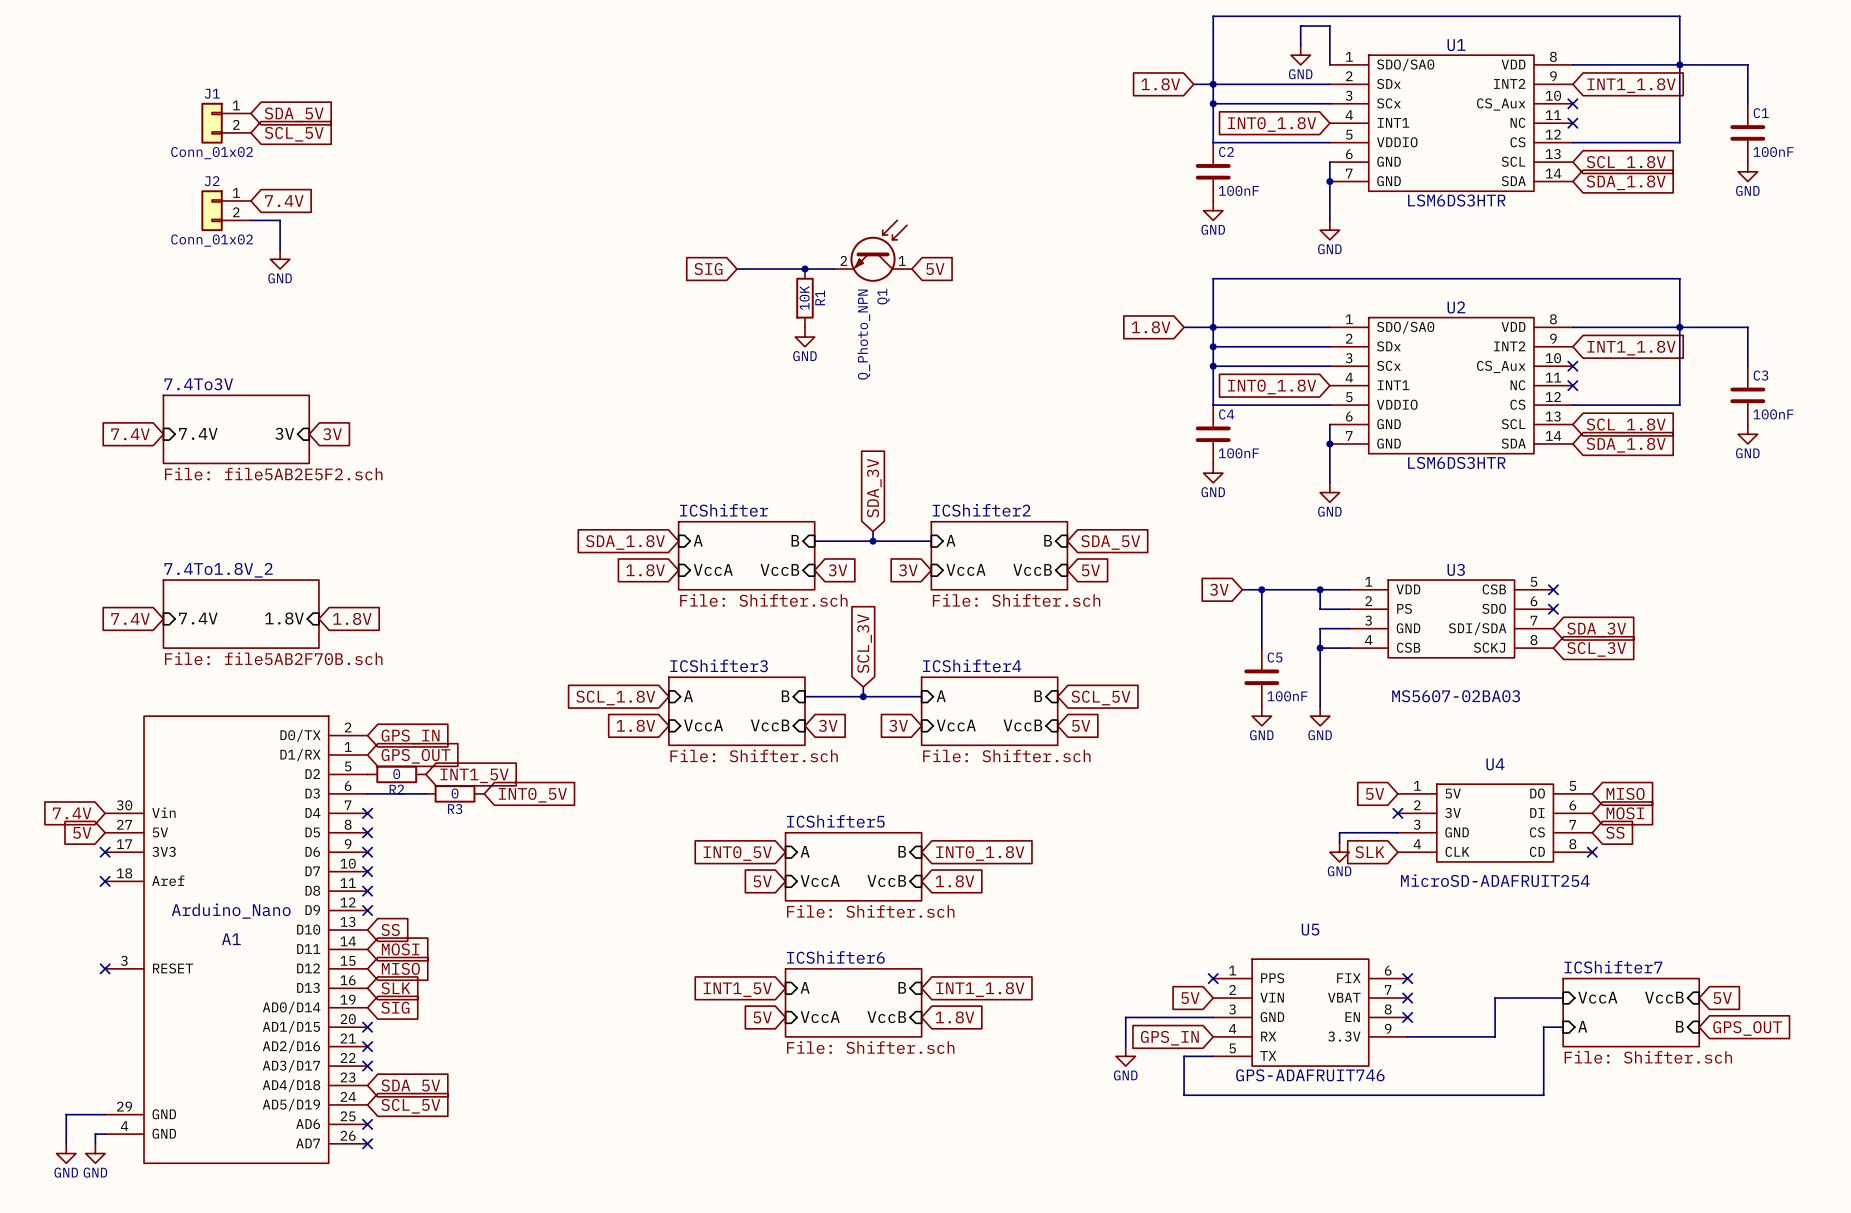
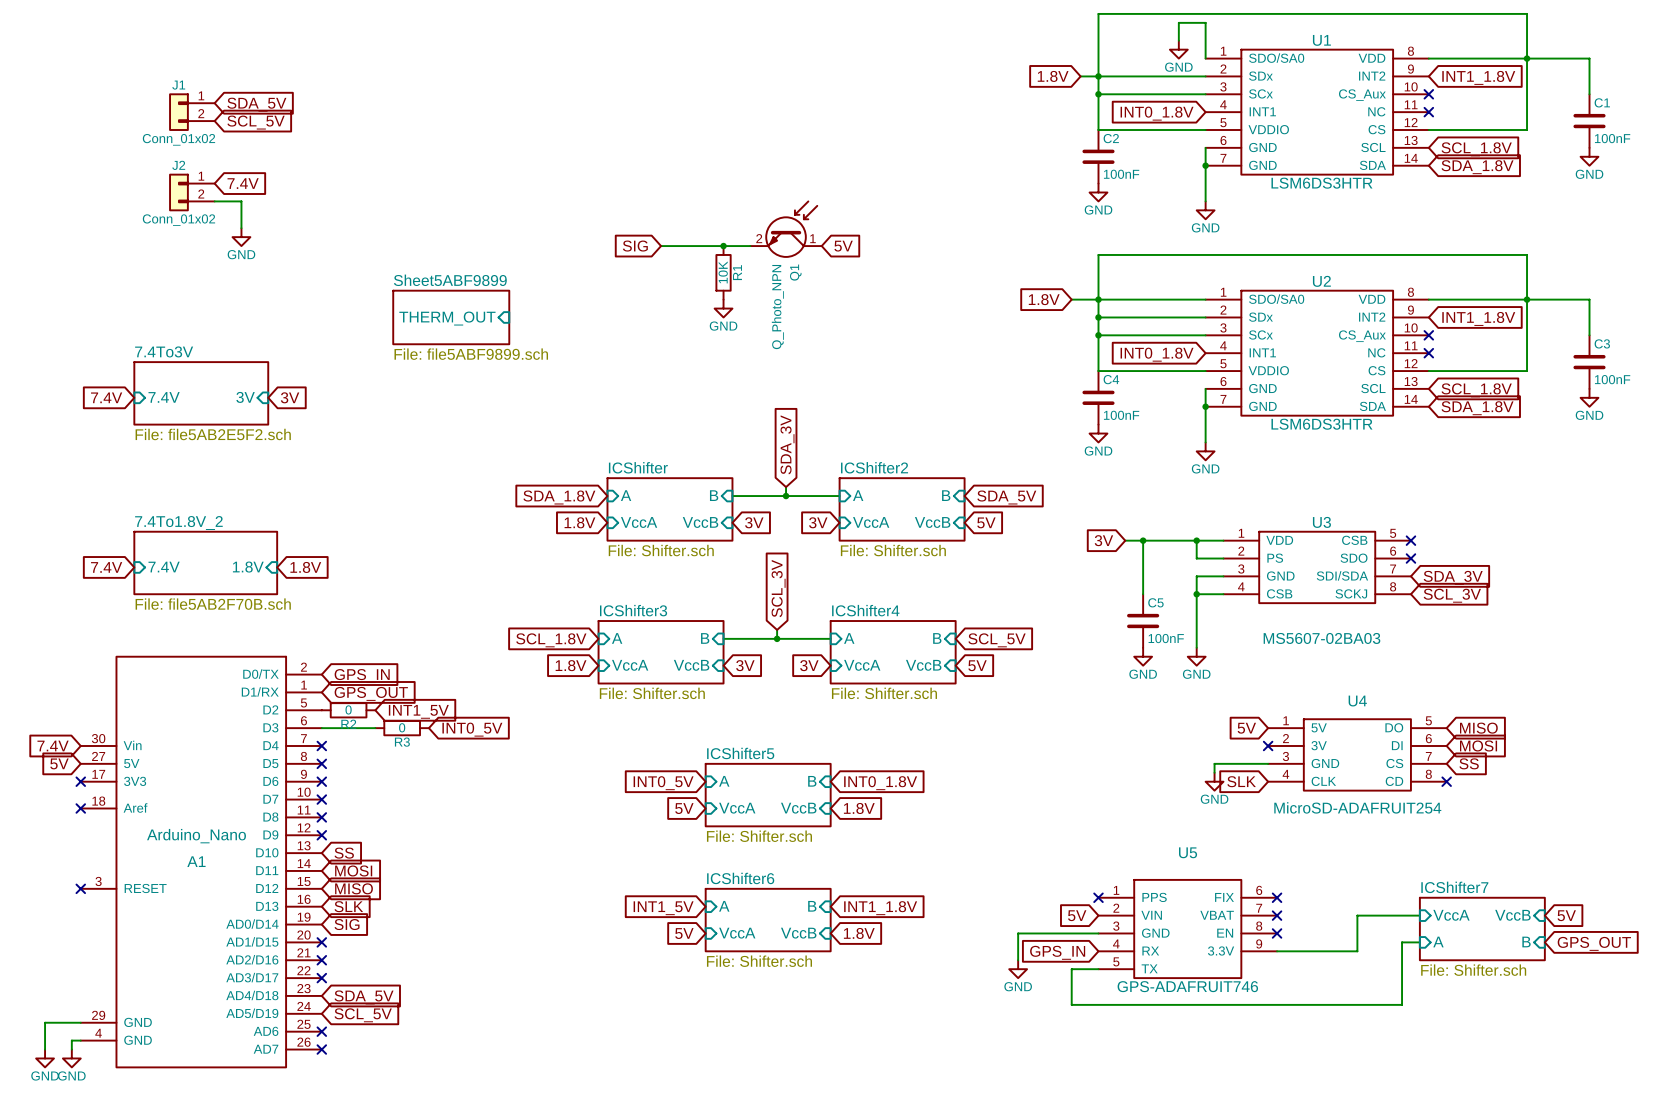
sheet Sheet5ABF9899: none -> File: file5ABF9899.sch (451, 317)
sheet pin: none -> THERM_OUT (447, 318)

